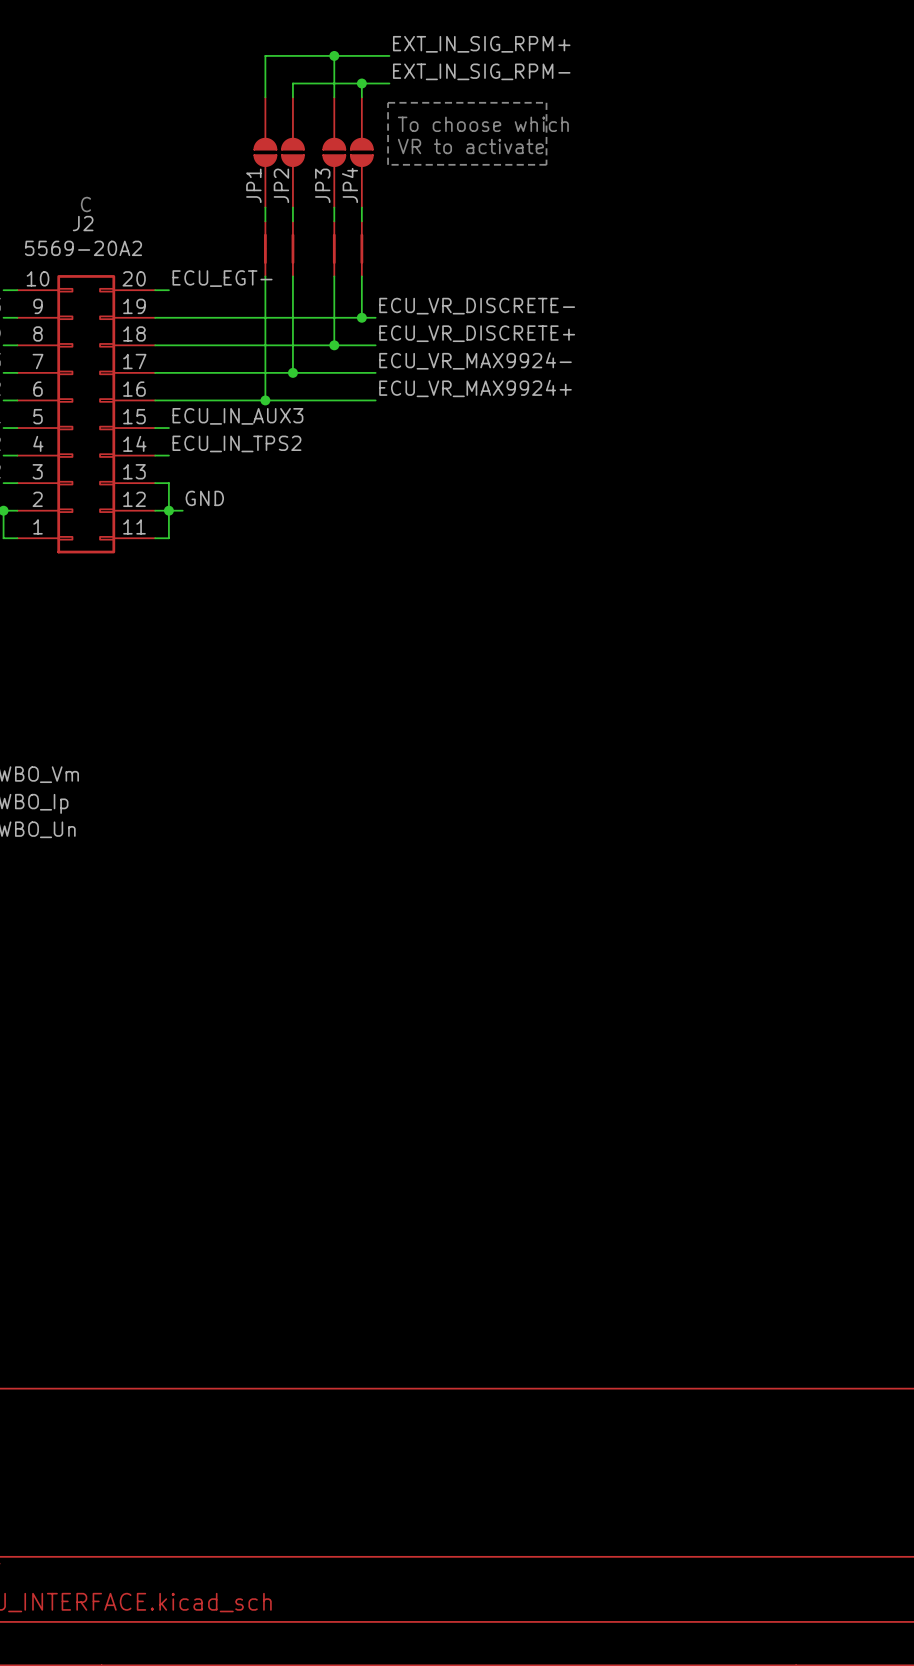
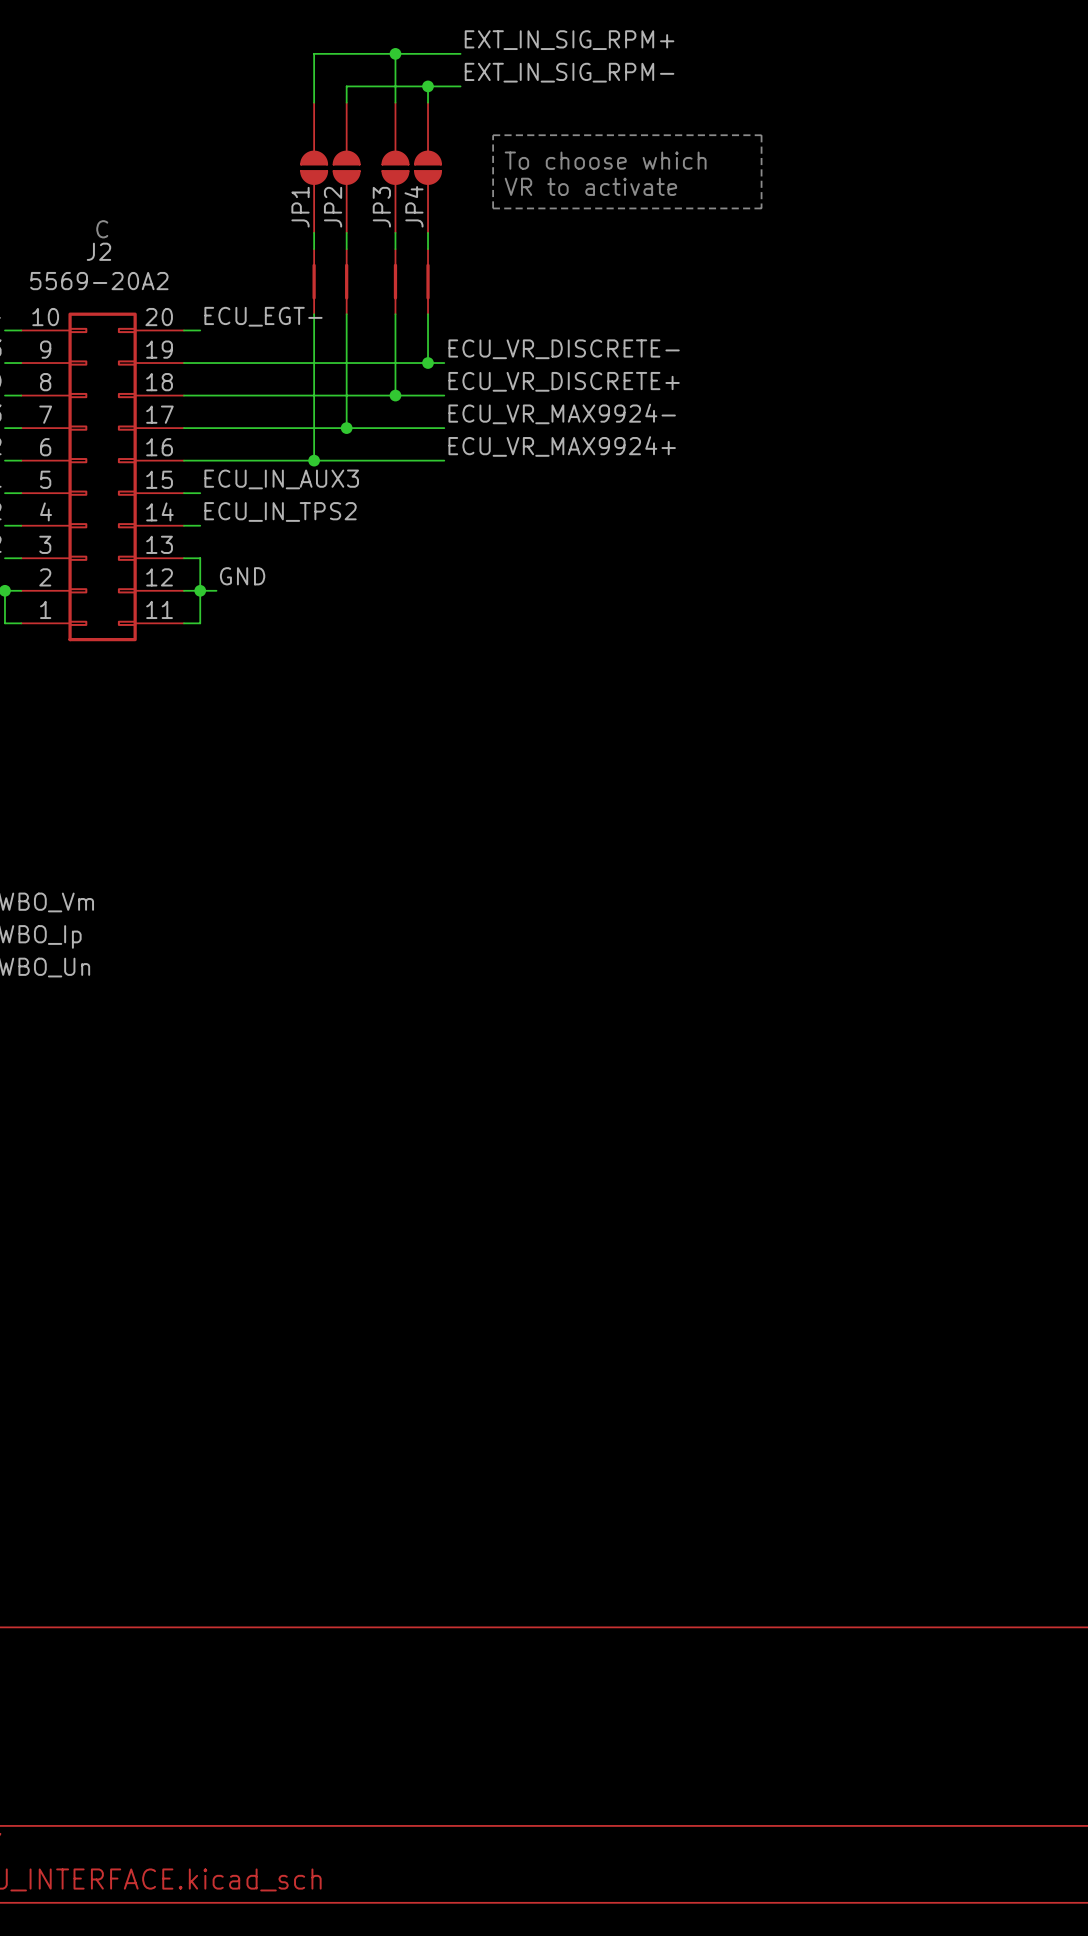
line: (388, 102) (546, 102) (546, 164) (388, 164) (388, 102) -> none
line: none -> (493, 135) (761, 135) (761, 208) (493, 208) (493, 135)
text position: To choose which (483, 124) -> To choose which (605, 160)
text position: VR to activate (470, 146) -> VR to activate (590, 186)

